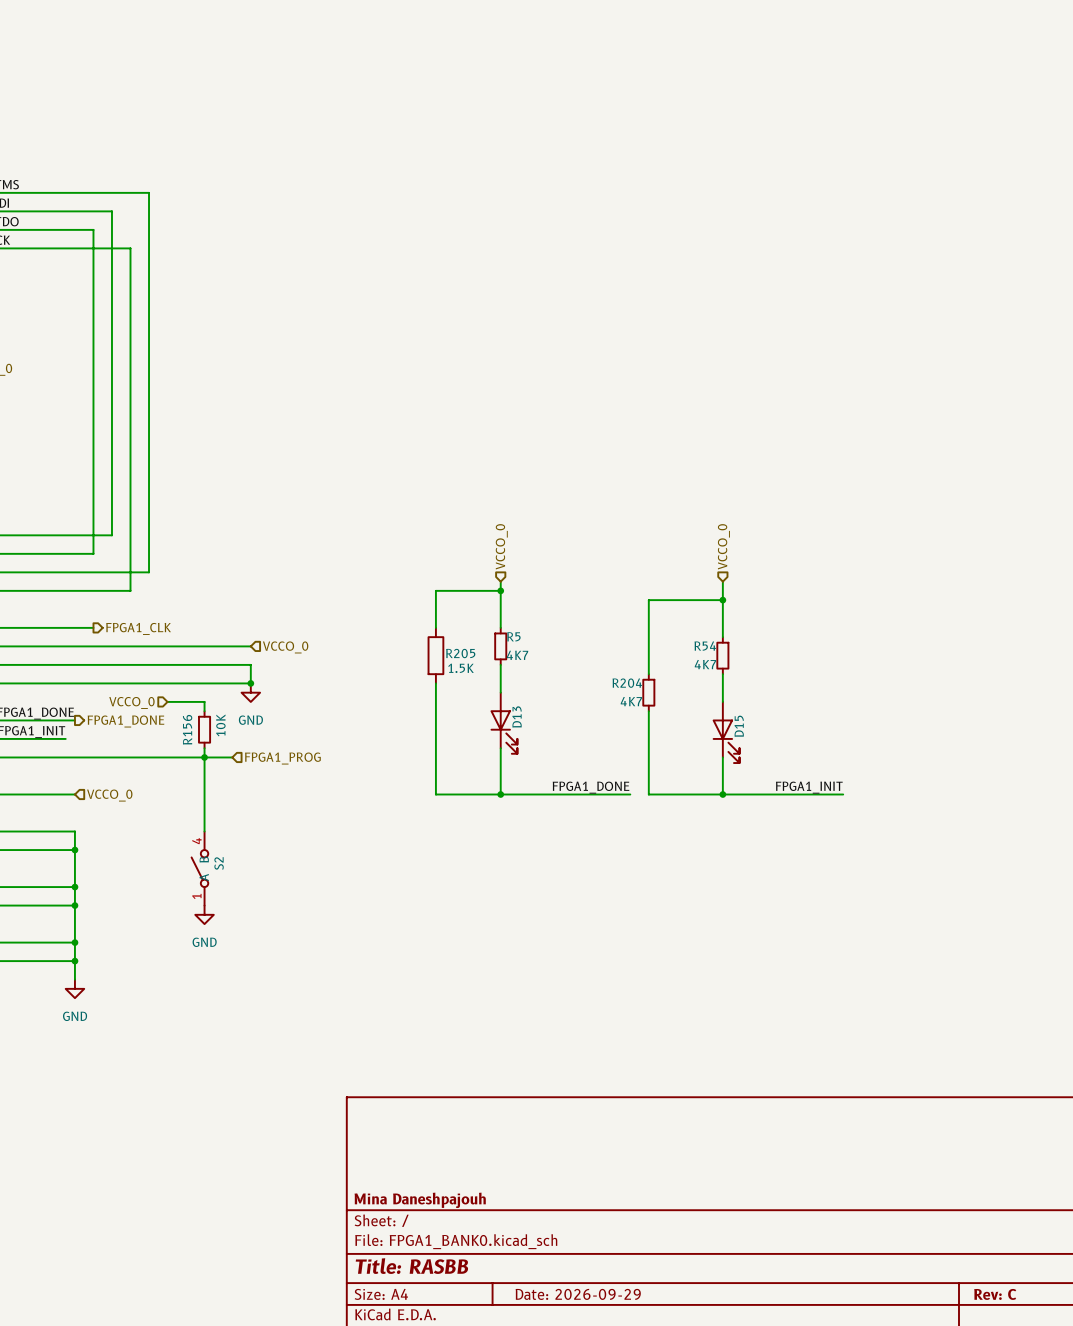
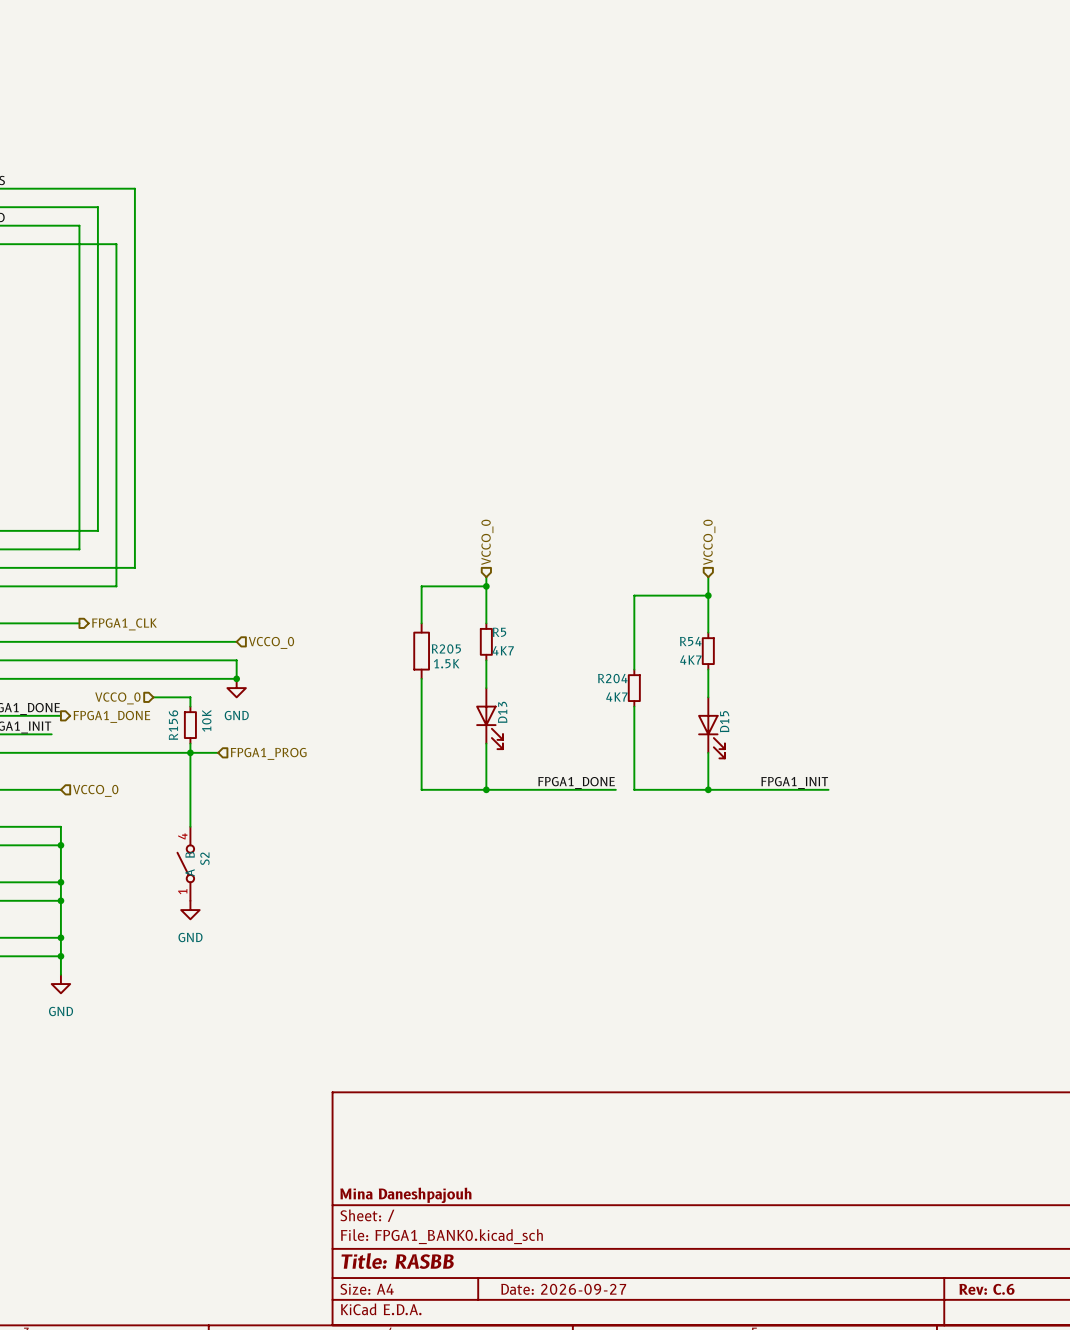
title block: Date: 2026-09-29 (578, 1294) -> Date: 2026-09-27 (563, 1289)
title block: Rev: C (995, 1294) -> Rev: C.6 (986, 1289)

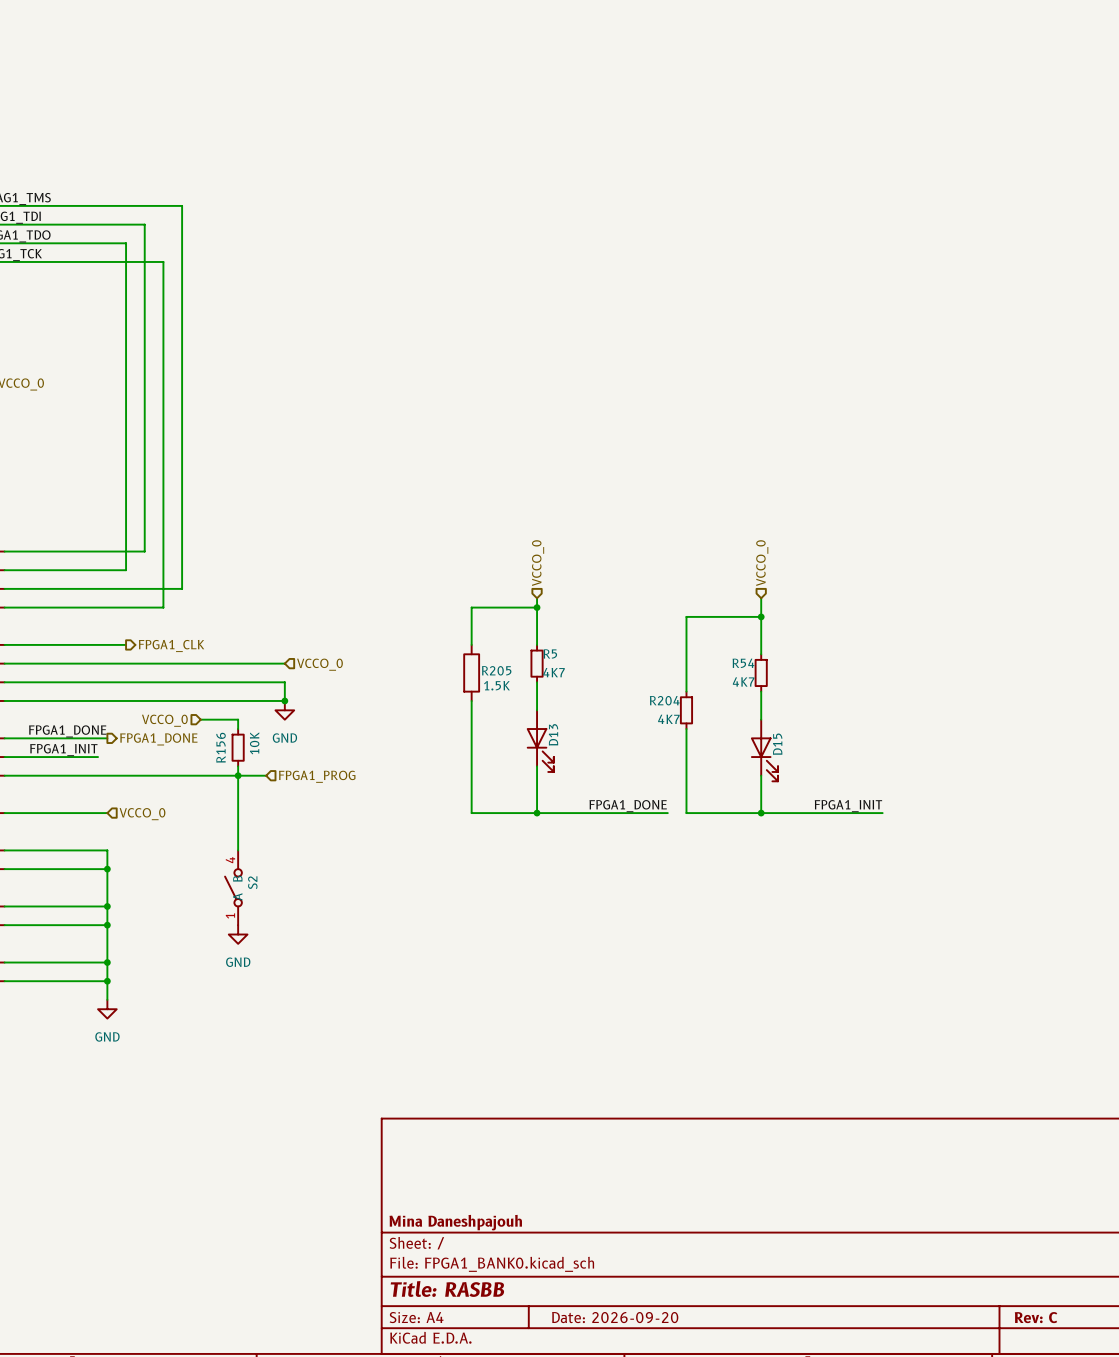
title block: Date: 2026-09-27 (563, 1289) -> Date: 2026-09-20 (615, 1317)
title block: Rev: C.6 (986, 1289) -> Rev: C (1036, 1317)

